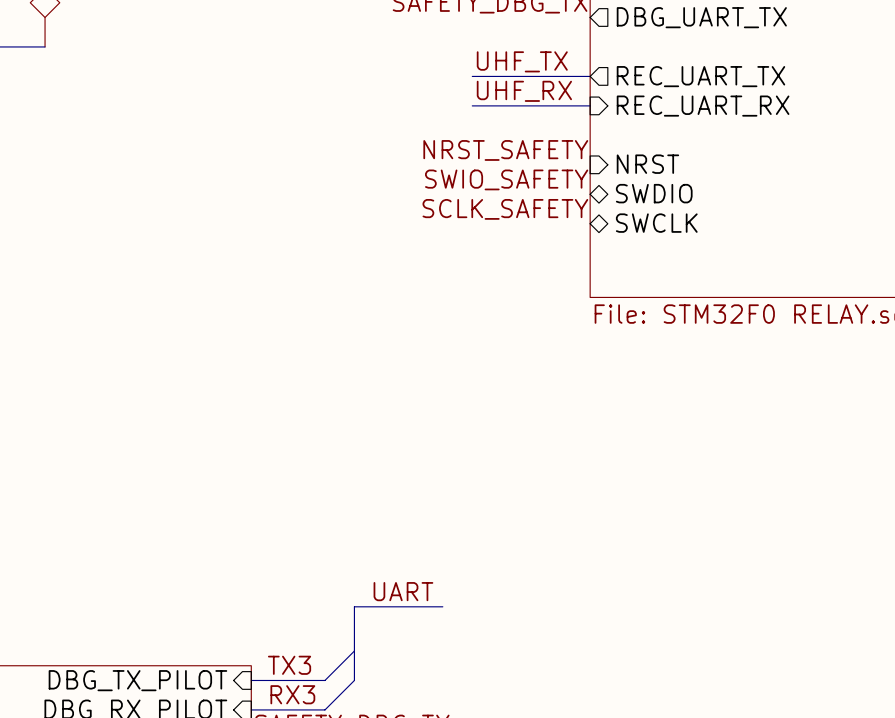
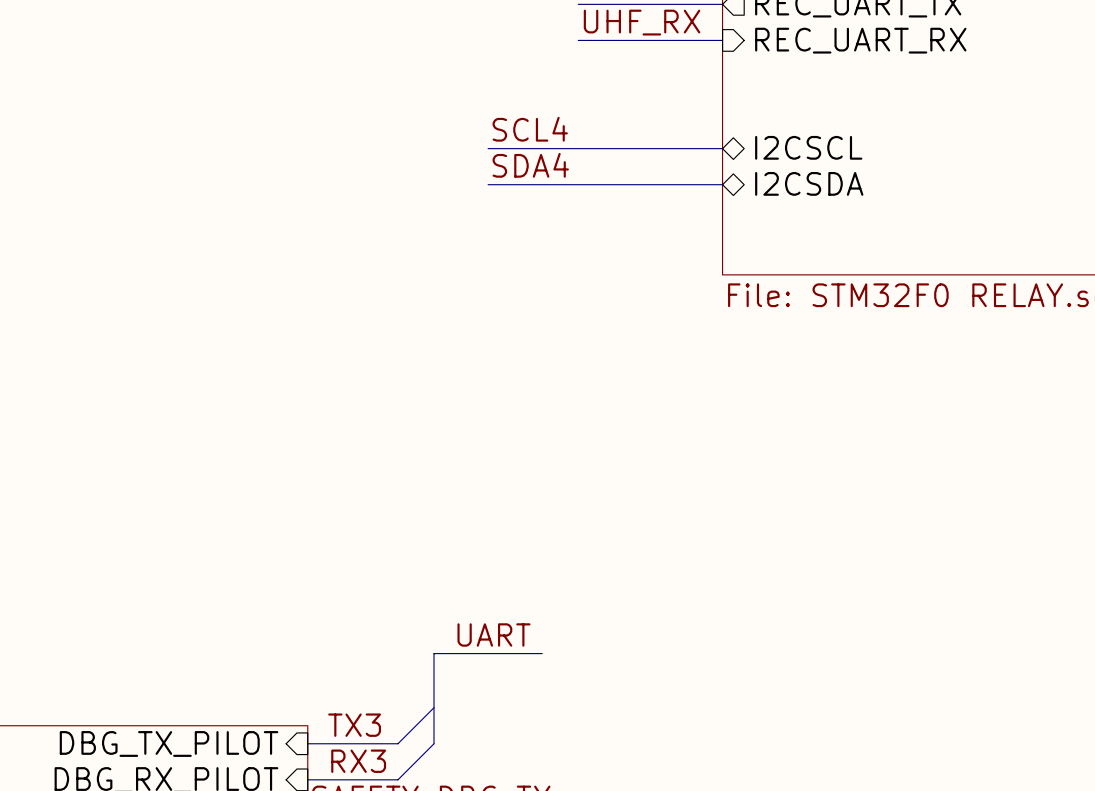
label: NRST_SAFETY (505, 150) -> none
sheet pin: NRST (647, 164) -> none
label: none -> SCL4 (530, 129)
label: SWIO_SAFETY (506, 179) -> none
sheet pin: SWDIO (654, 193) -> I2CSCL (808, 147)
wire: none -> (488, 148) (722, 148)
label: none -> SDA4 (530, 165)
label: SCLK_SAFETY (505, 209) -> none
wire: none -> (488, 184) (722, 184)
sheet pin: SWCLK (656, 223) -> I2CSDA (809, 183)

